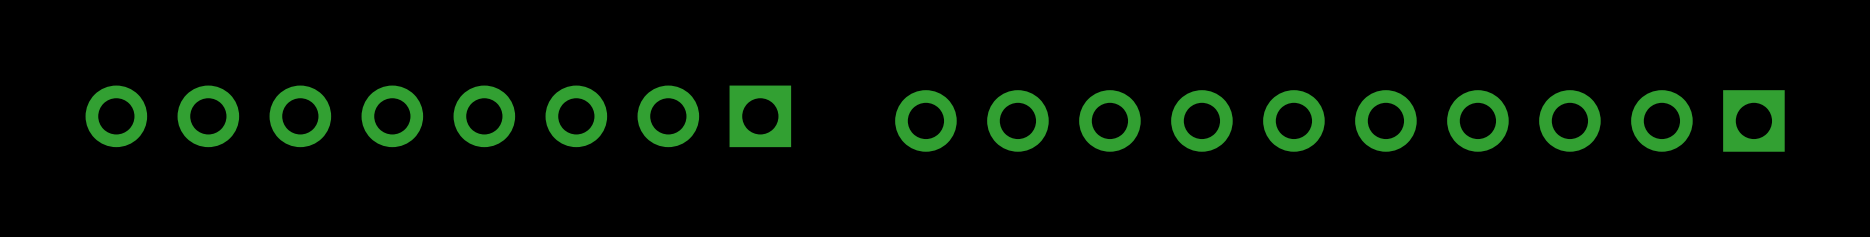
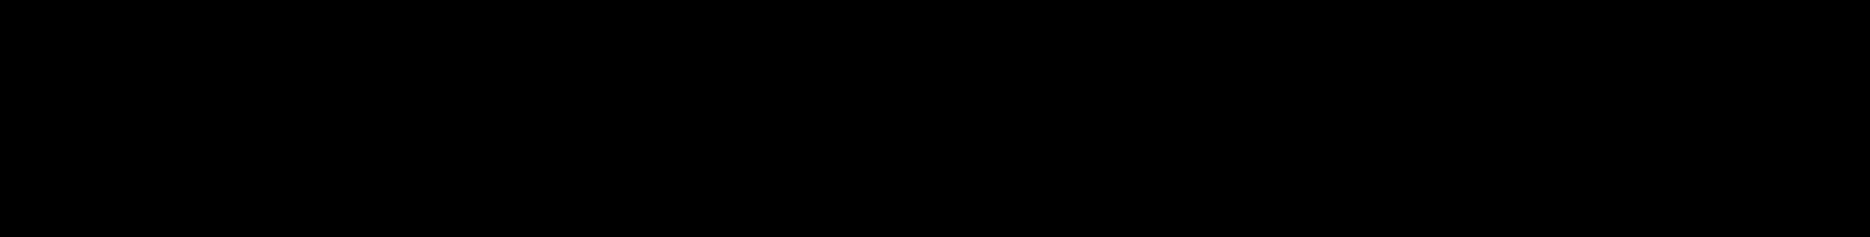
part: (438, 116) -> none
part: (1339, 120) -> none

